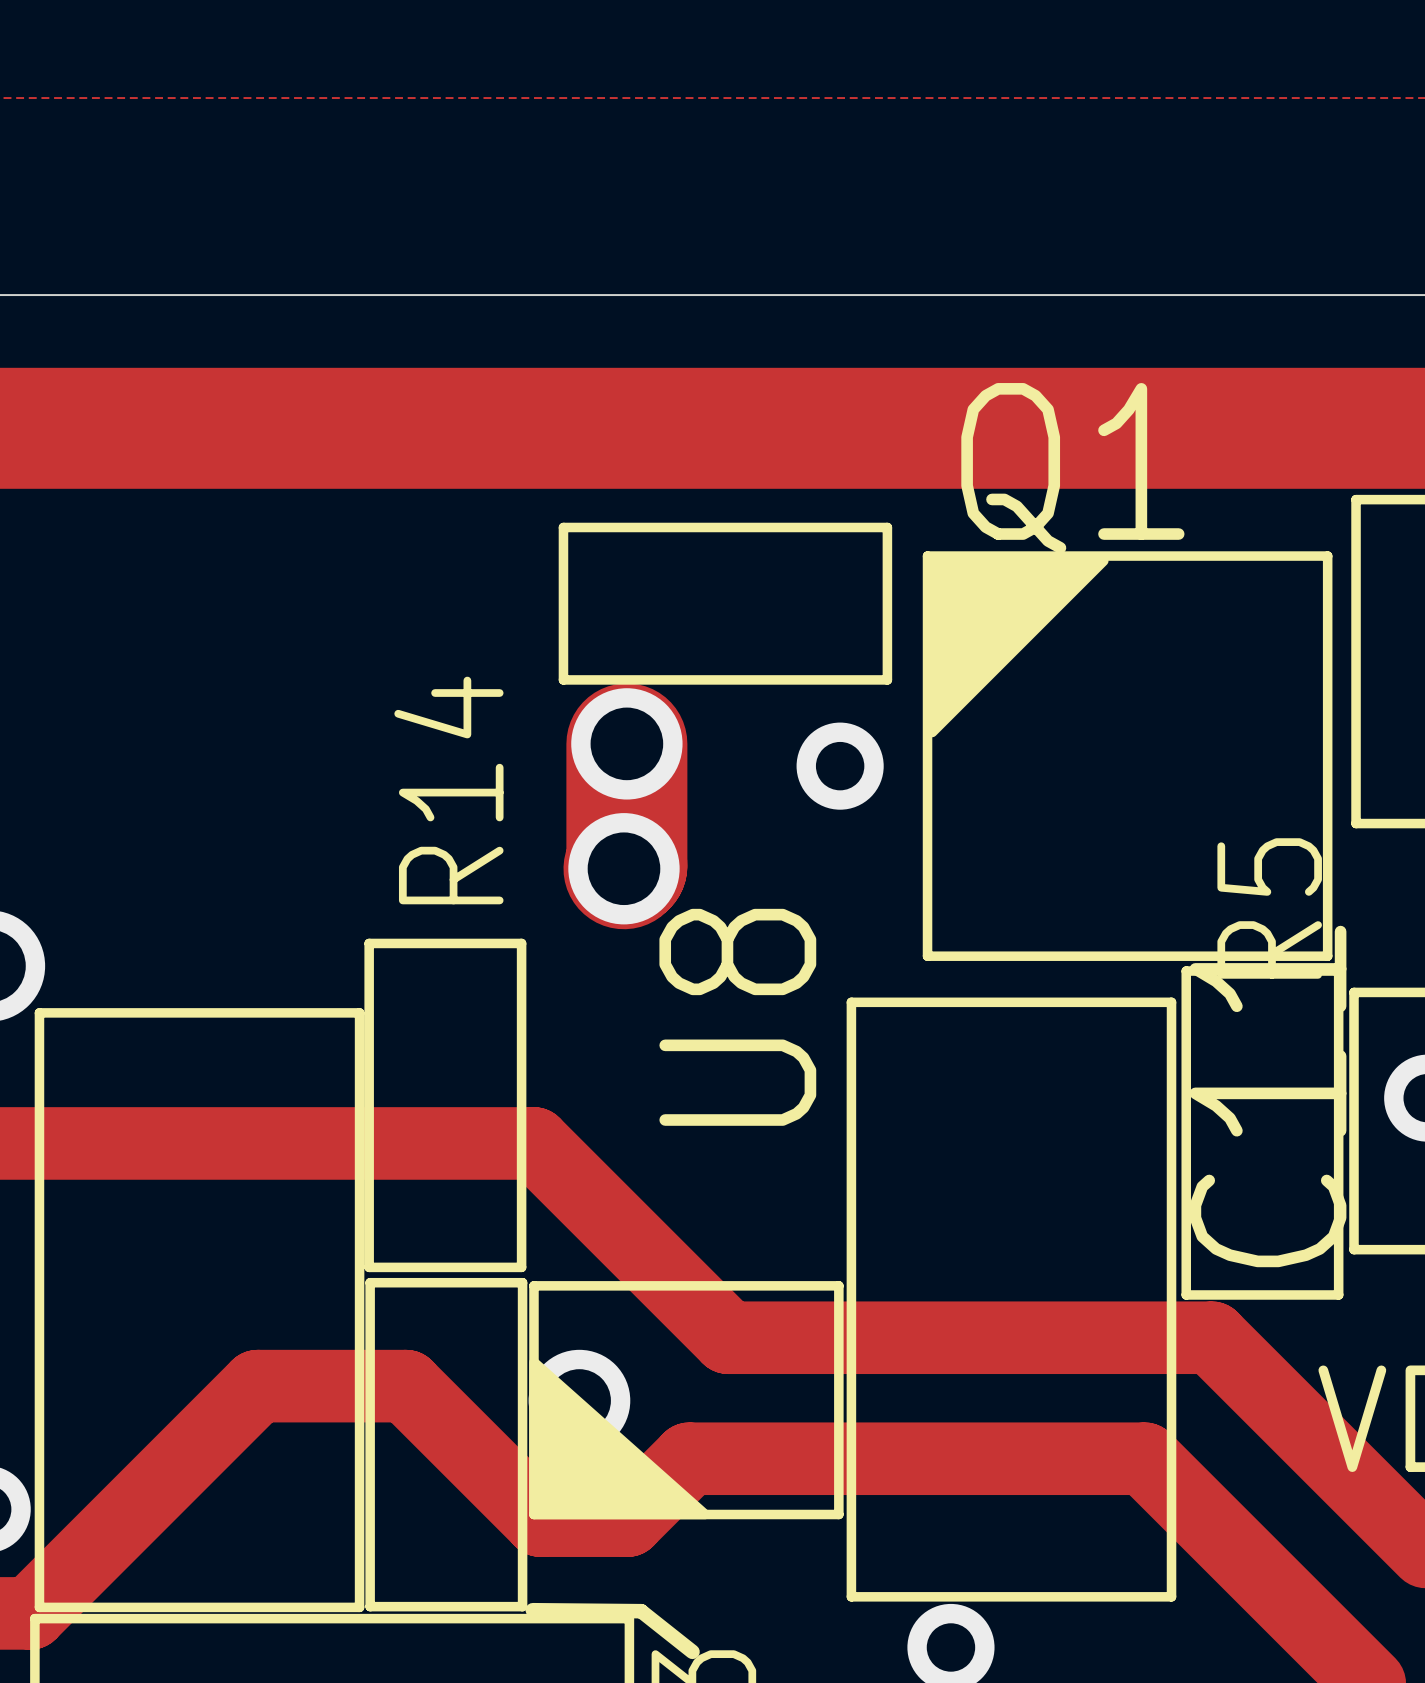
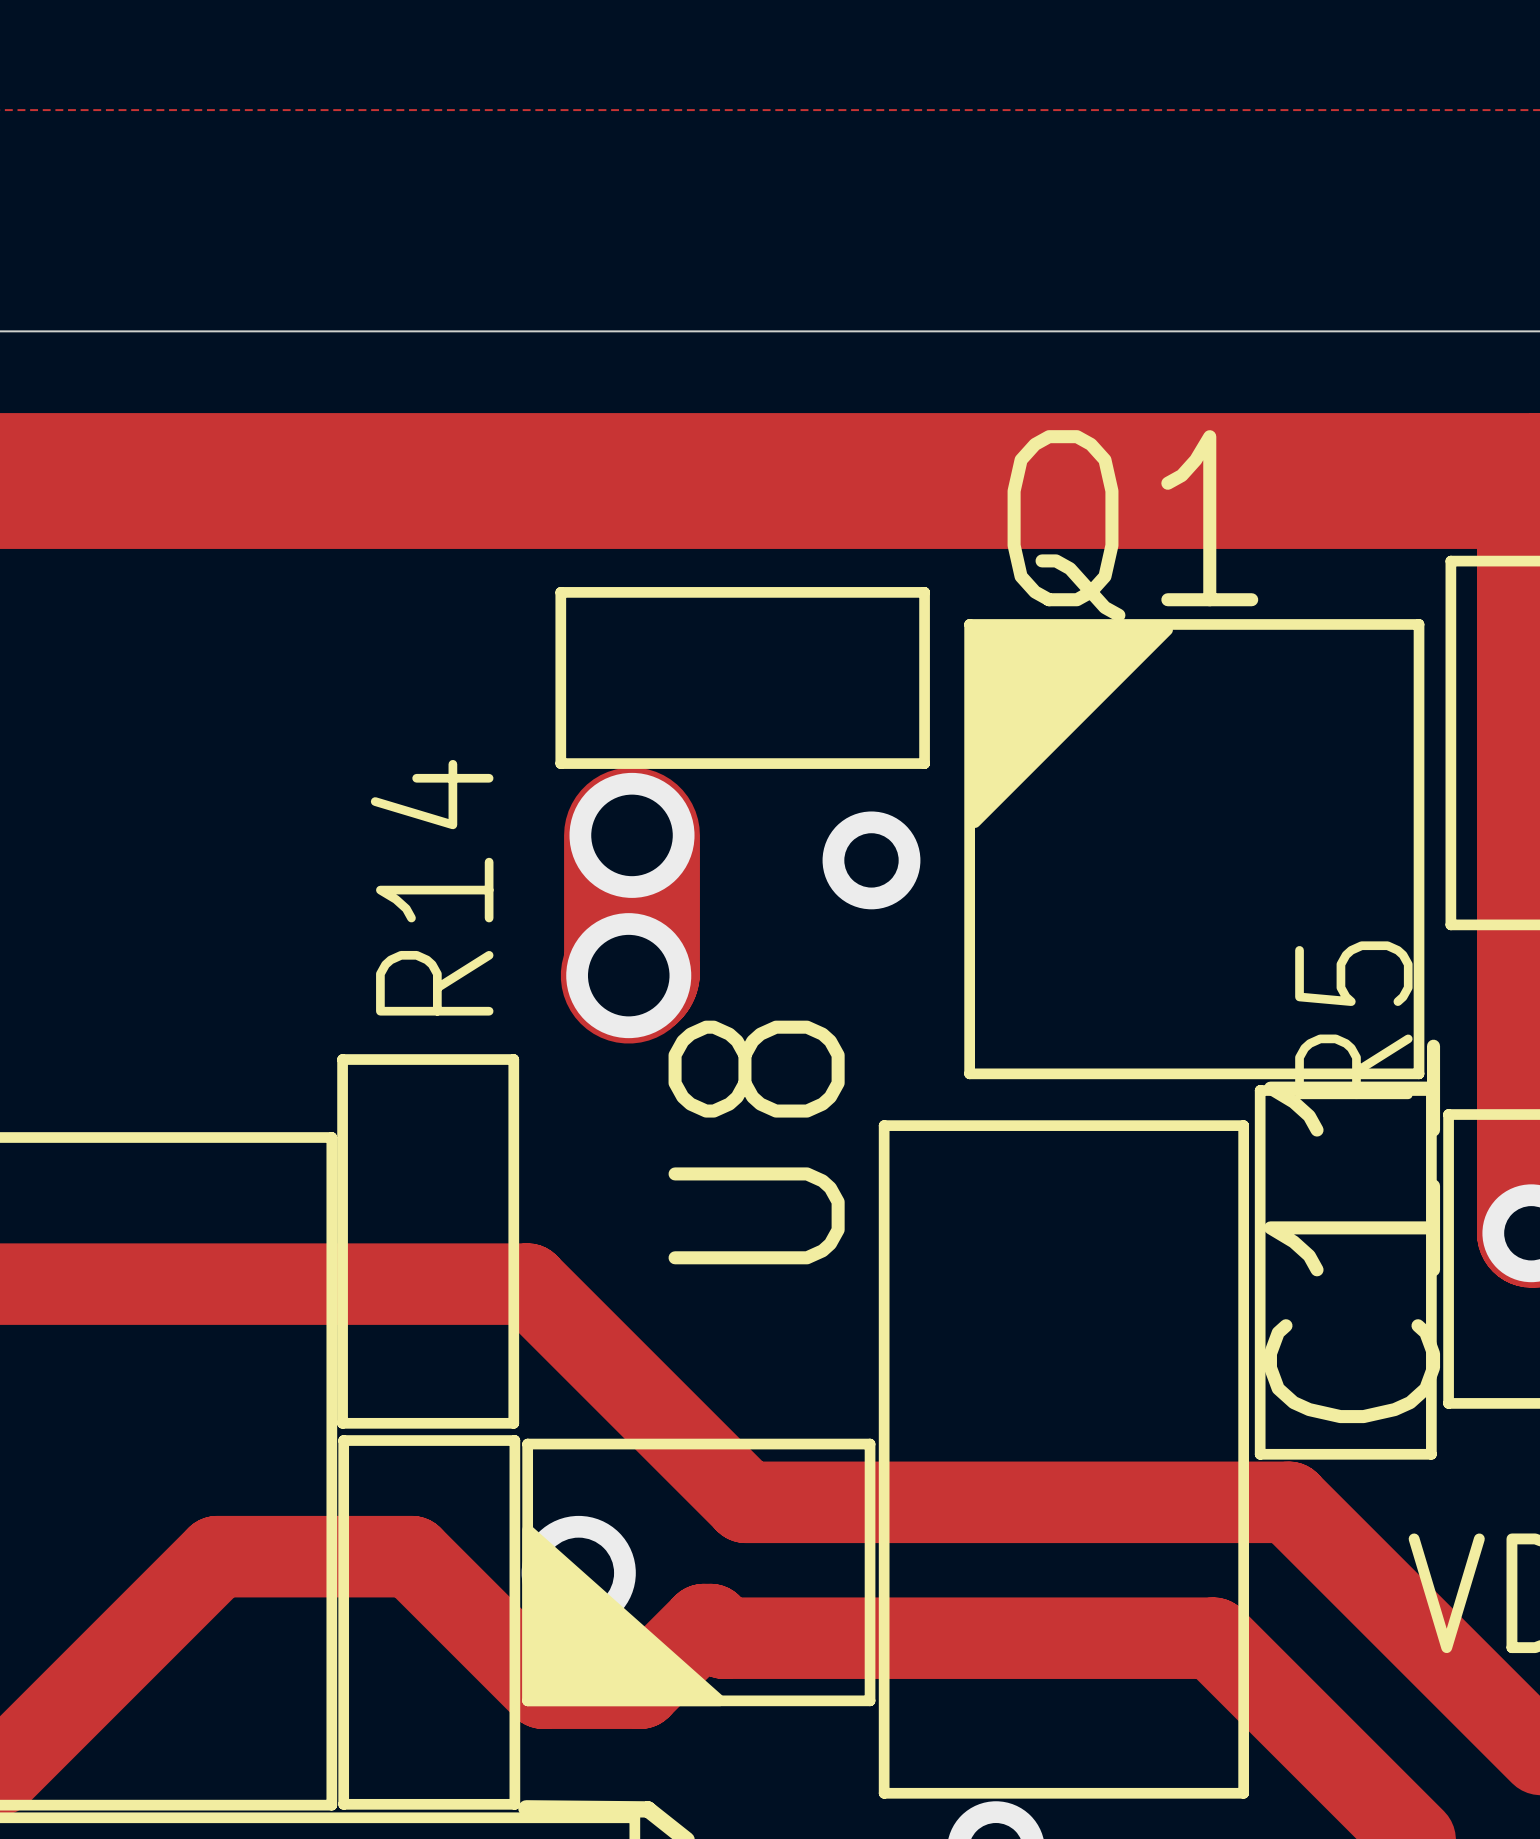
track: (406, 1386) (540, 1520) (627, 1520) (689, 1458) (709, 1458) -> (384, 1556) (411, 1556) (543, 1688) (640, 1688) (703, 1624) (710, 1624) (724, 1638)

